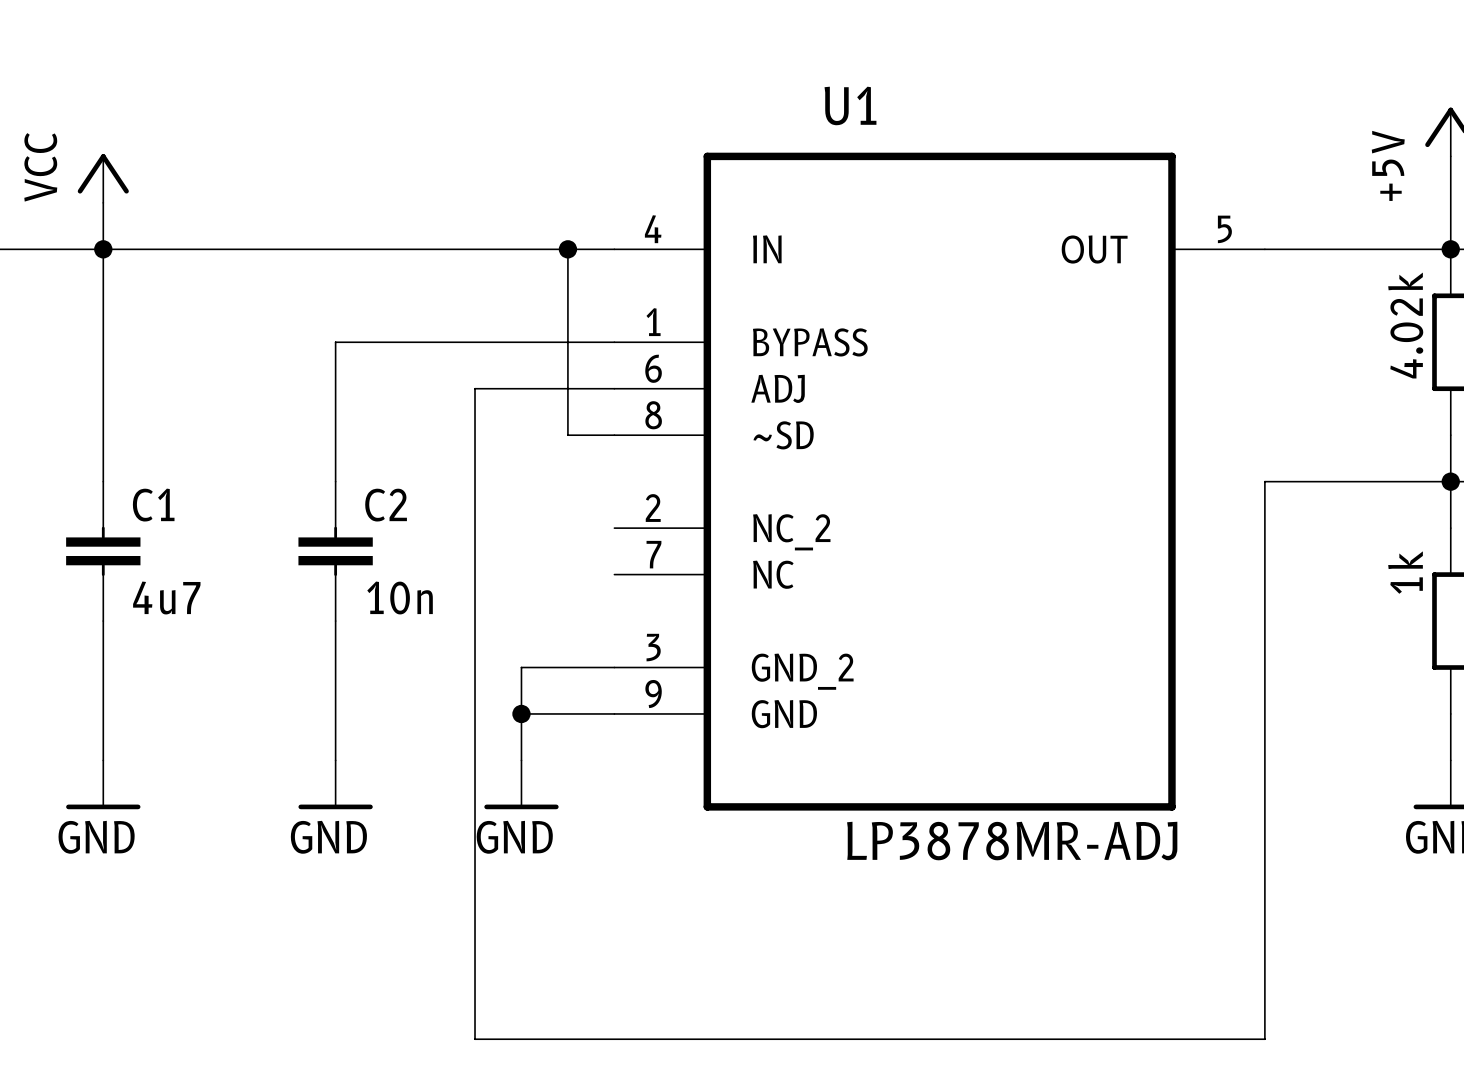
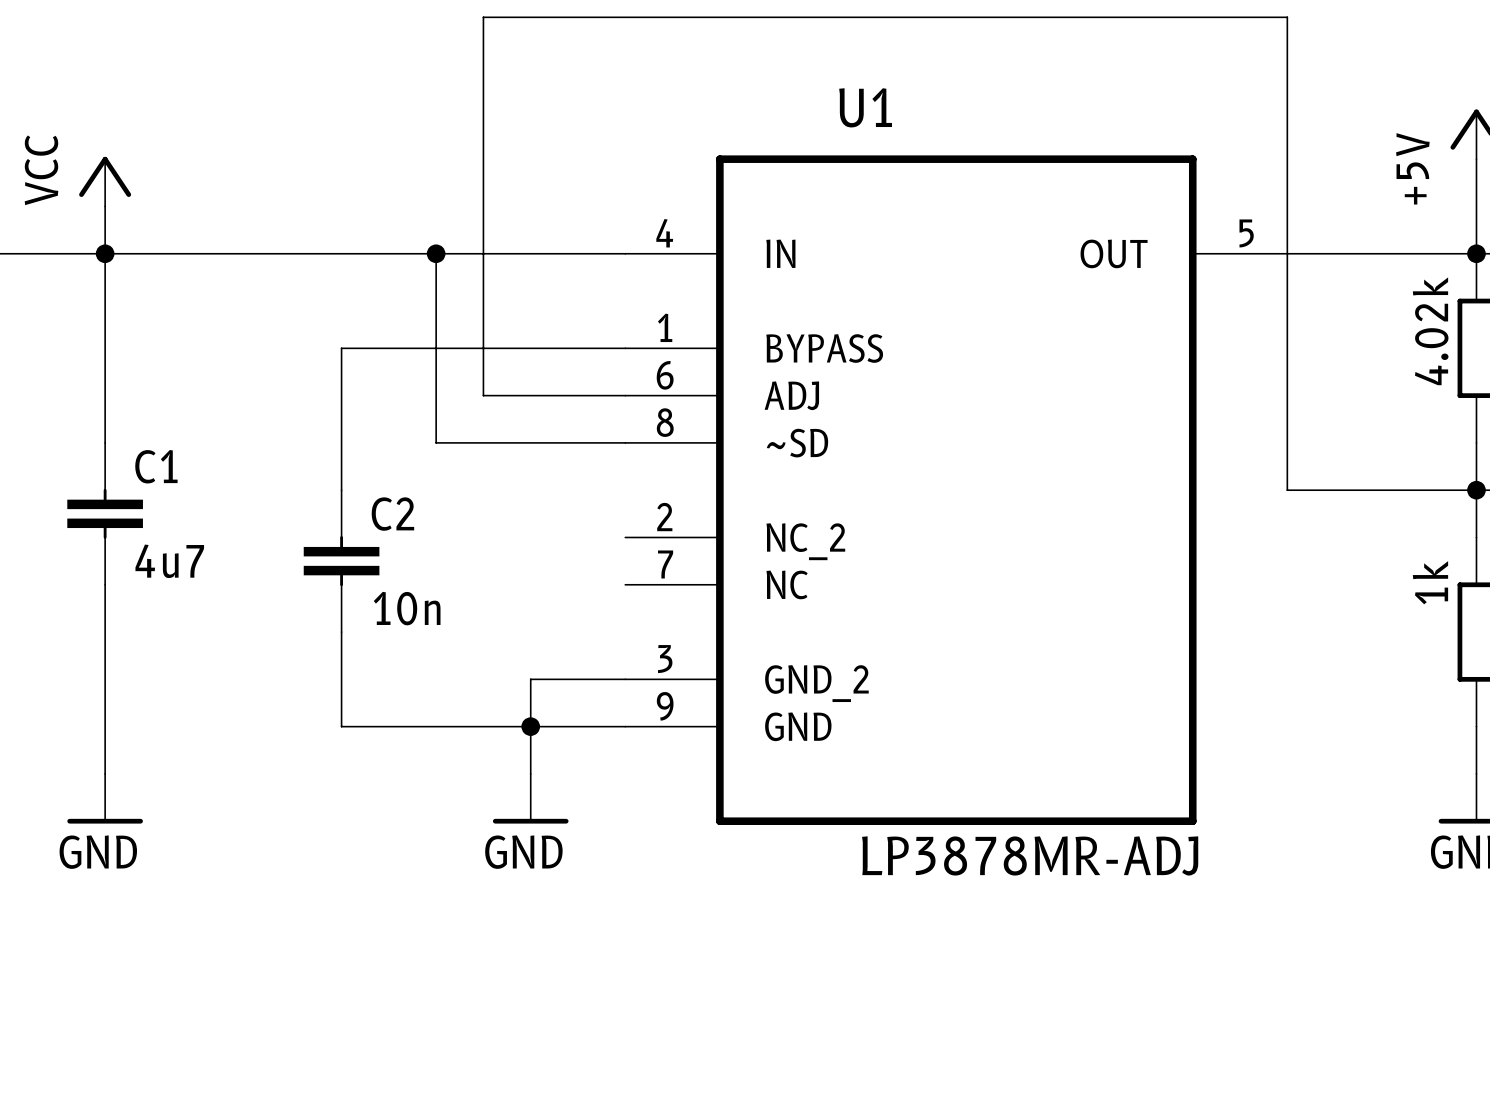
junction: none -> (436, 253)
wire: (567, 249) (567, 435) -> (436, 253) (436, 442) (578, 442)
junction: (567, 249) -> none
wire: (475, 388) (475, 1039) (1264, 1039) (1264, 481) -> (483, 395) (483, 17) (1287, 17) (1287, 490)
C1 position: (103, 551) -> (105, 513)
wire: (335, 713) (335, 760) -> (341, 726) (530, 726)
power symbol: GND (335, 784) -> none

